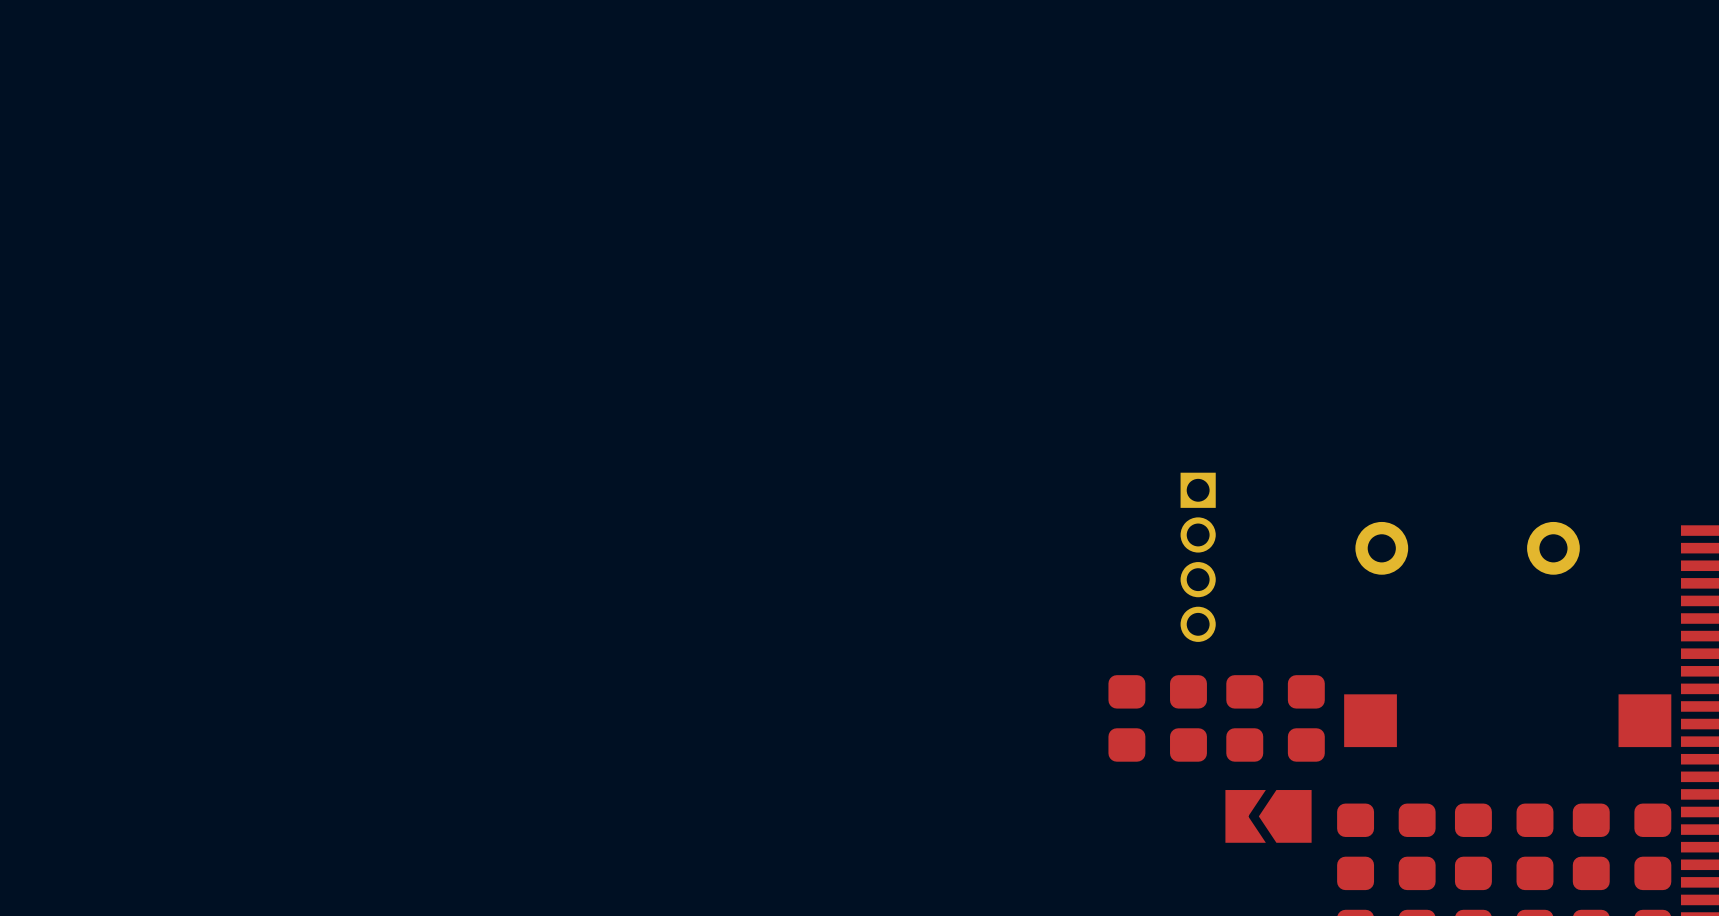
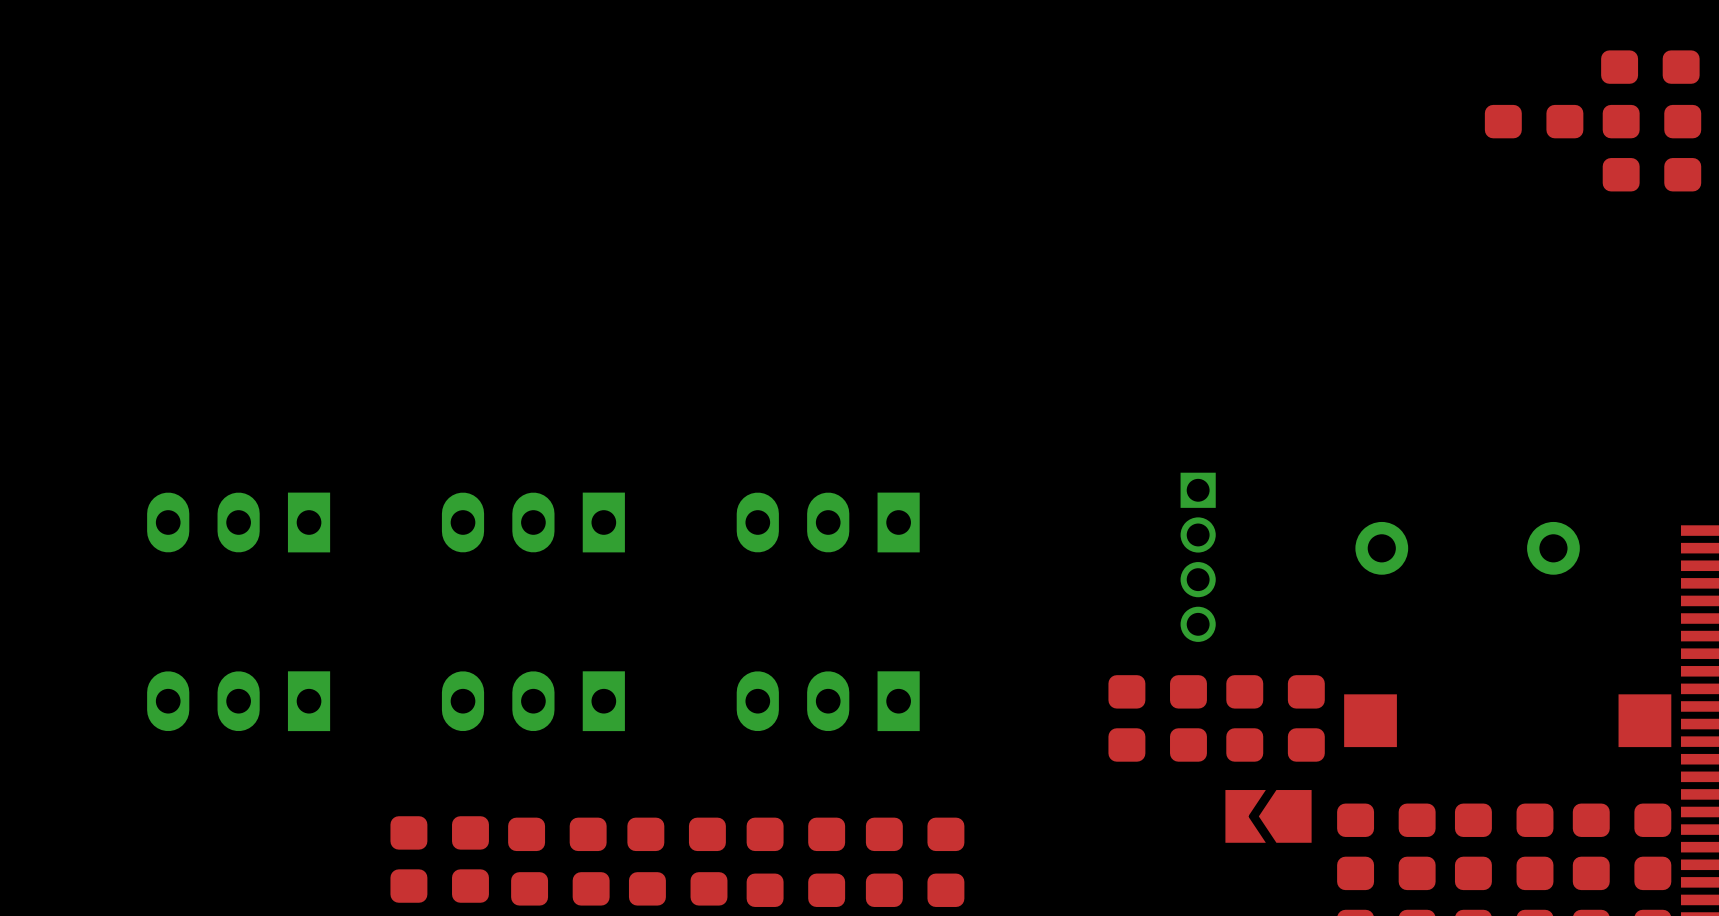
part: none -> (1650, 67)
part: none -> (1534, 121)
part: none -> (1651, 121)
part: none -> (1651, 174)
part: none -> (238, 522)
part: none -> (533, 522)
part: none -> (828, 522)
part: none -> (238, 701)
part: none -> (533, 701)
part: none -> (828, 701)
part: none -> (439, 832)
part: none -> (557, 834)
part: none -> (676, 834)
part: none -> (795, 834)
part: none -> (915, 834)
part: none -> (439, 886)
part: none -> (560, 888)
part: none -> (678, 888)
part: none -> (795, 890)
part: none -> (915, 890)

